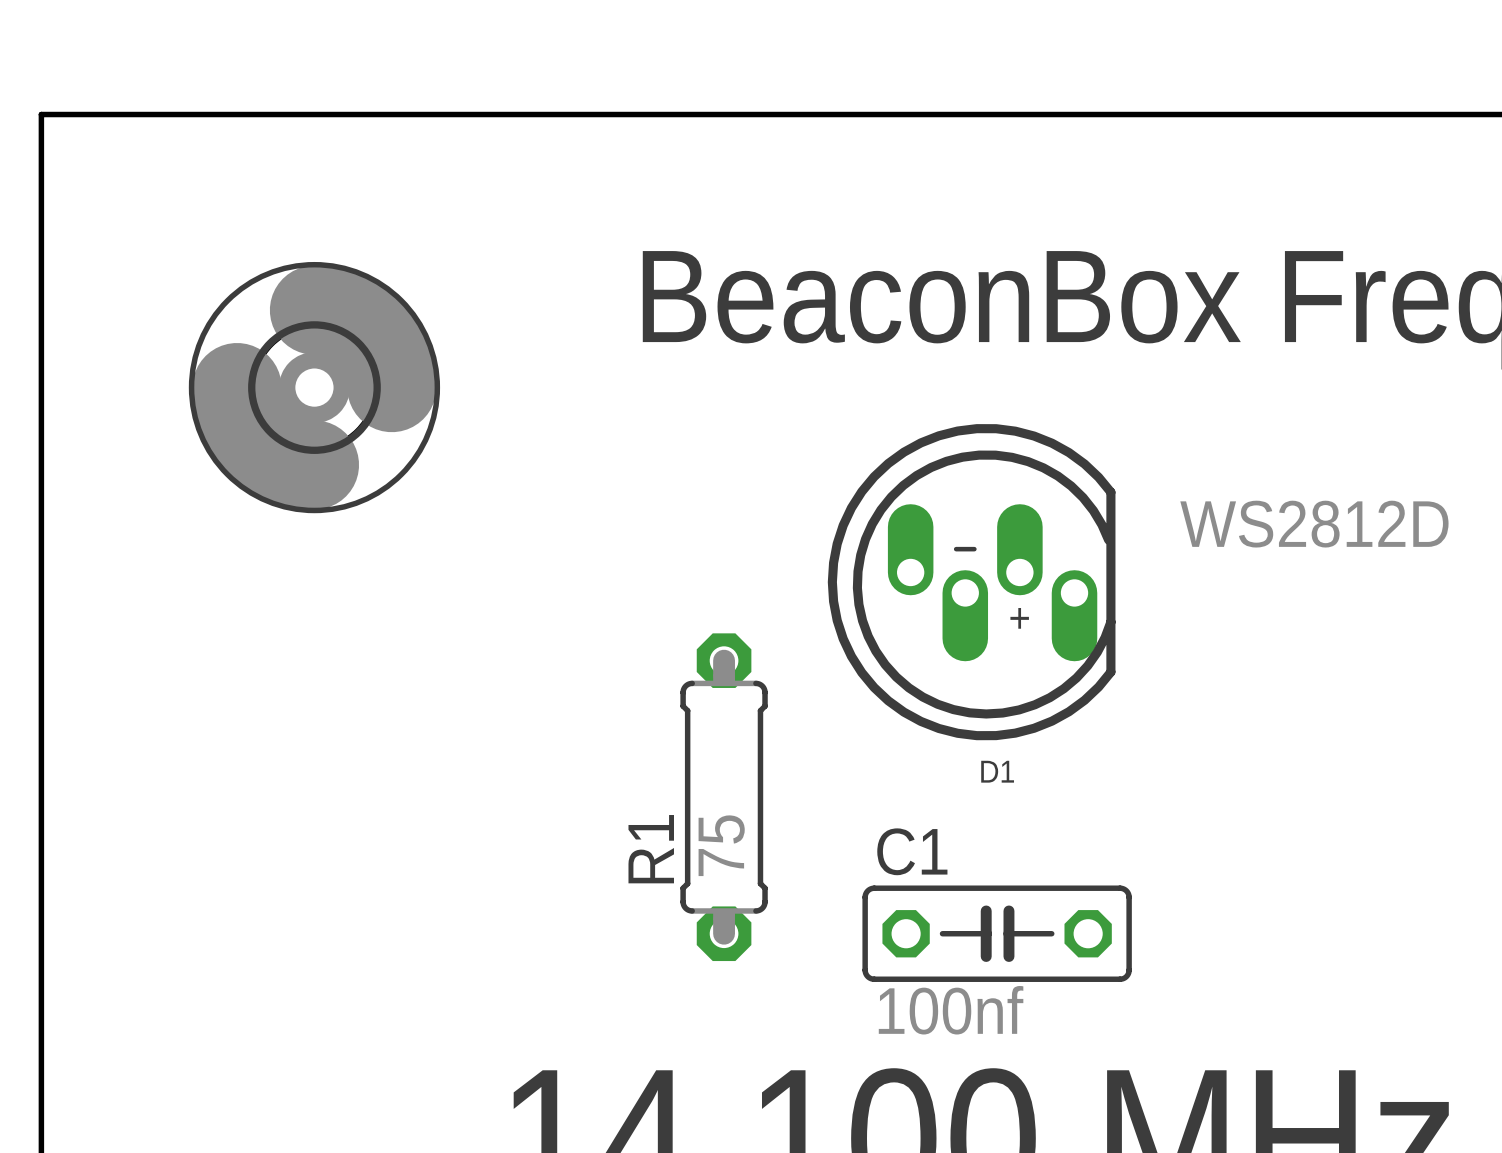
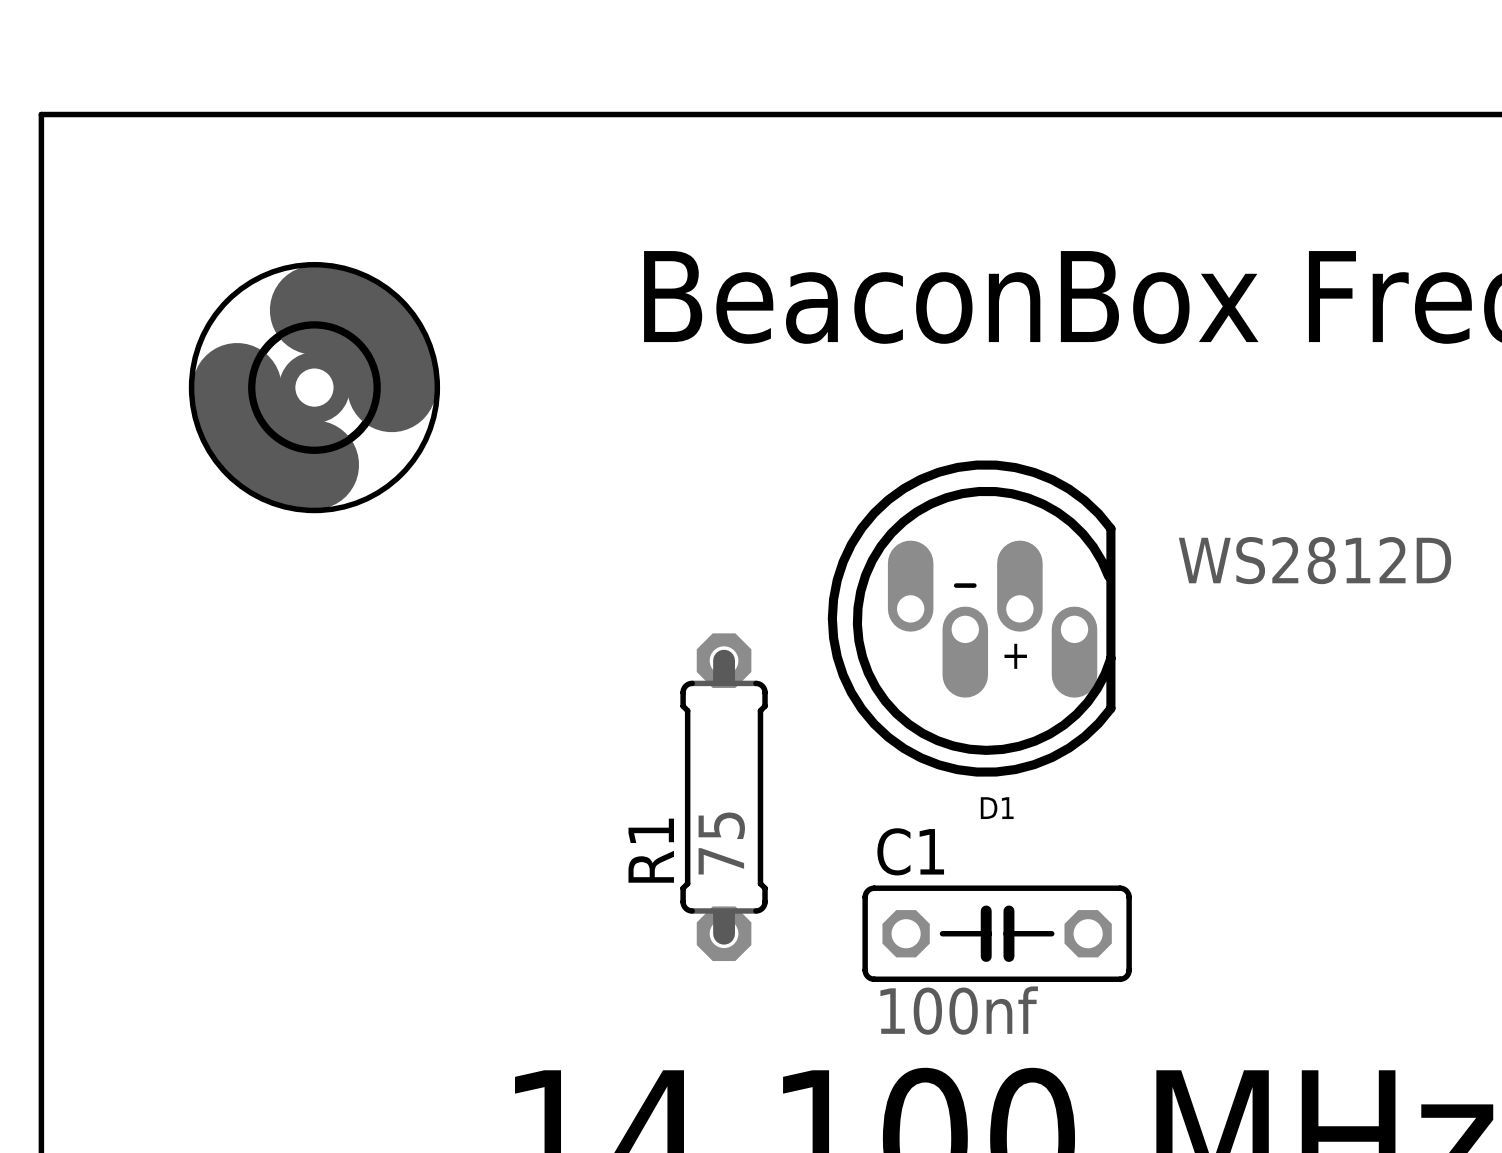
D1 position: (971, 582) -> (971, 618)

